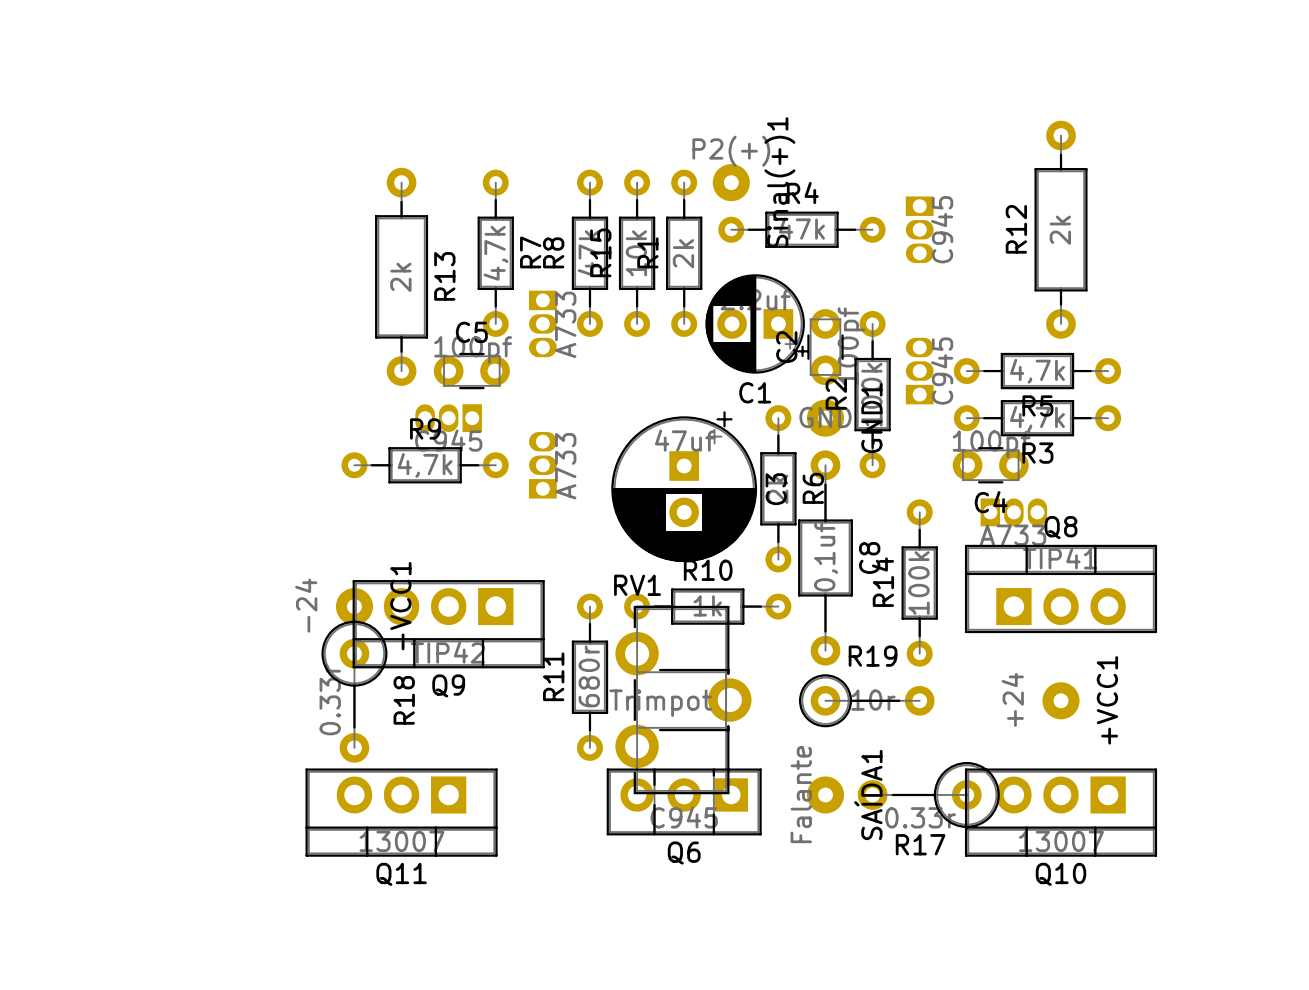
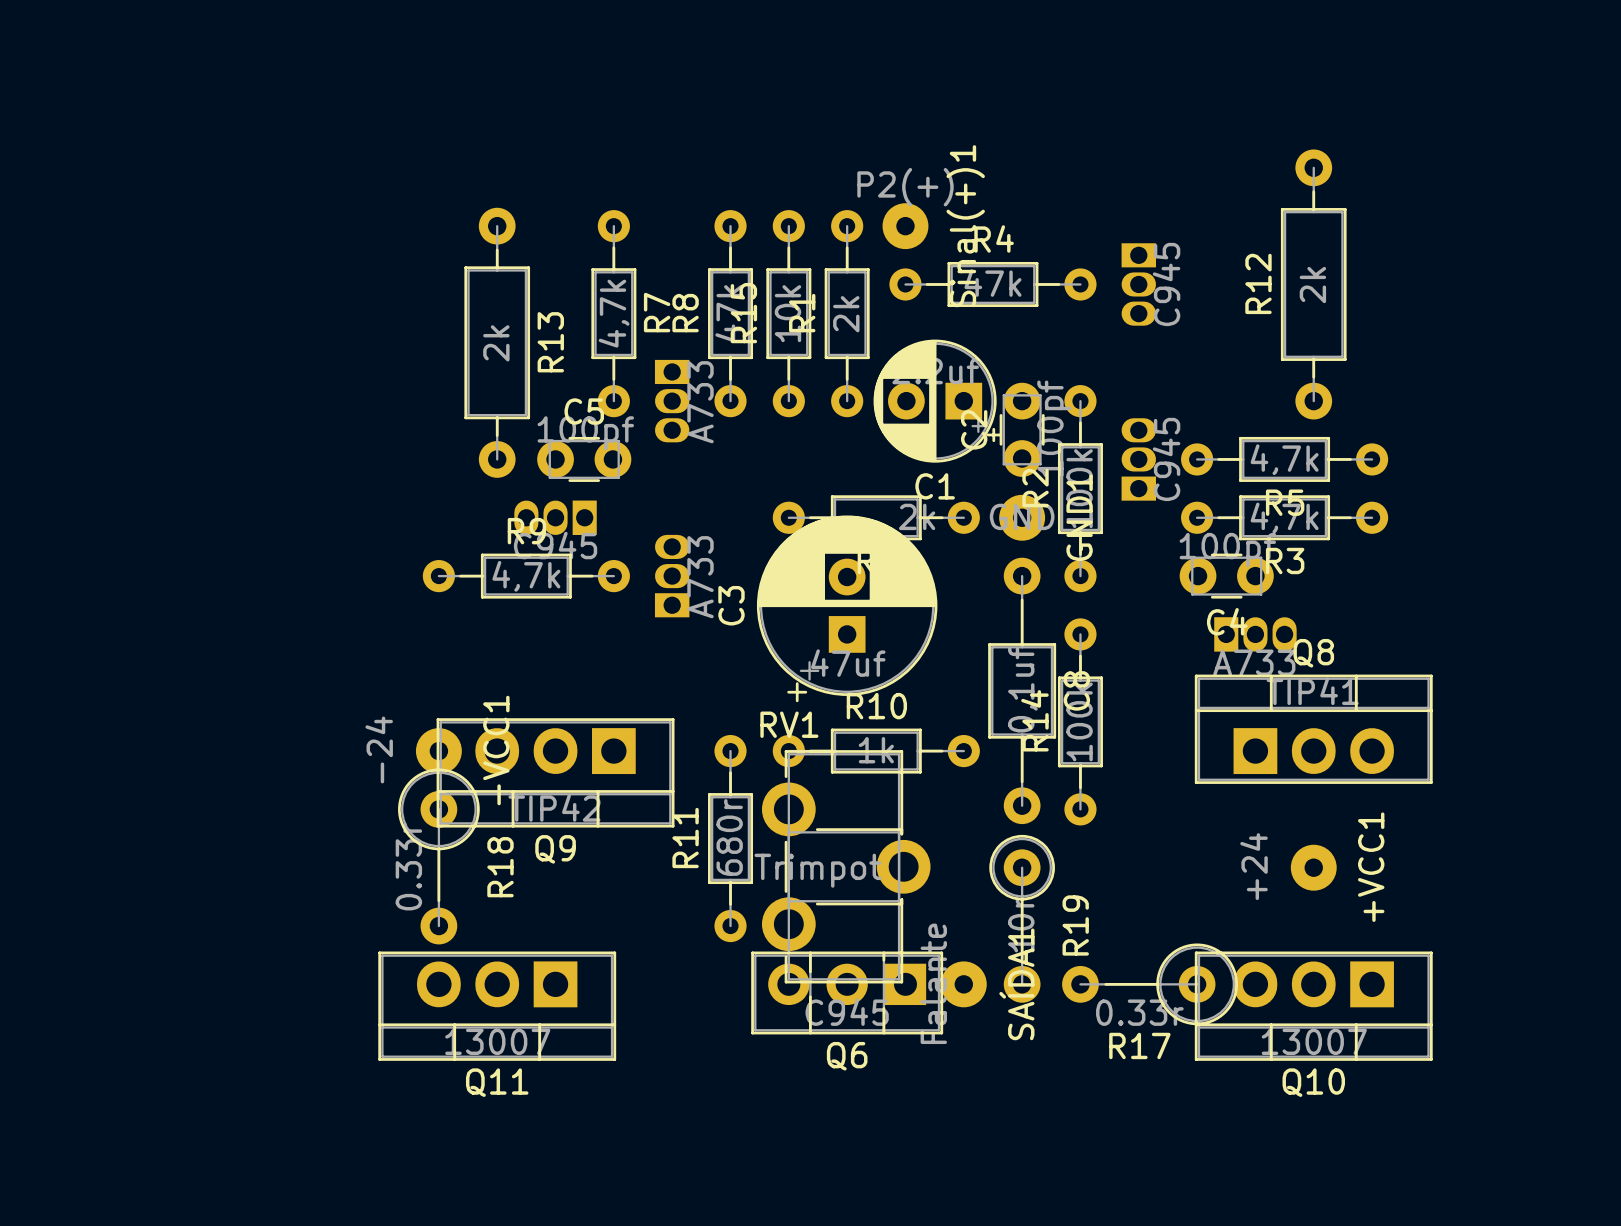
C3 rotation: 0° (684, 486) -> 180° (847, 608)
R6 rotation: 0° (778, 488) -> 90° clockwise (876, 517)
R14 position: (919, 583) -> (1080, 721)
R19 rotation: 0° (866, 700) -> 90° clockwise (1022, 918)
SAÍDA1 position: (825, 794) -> (963, 984)

